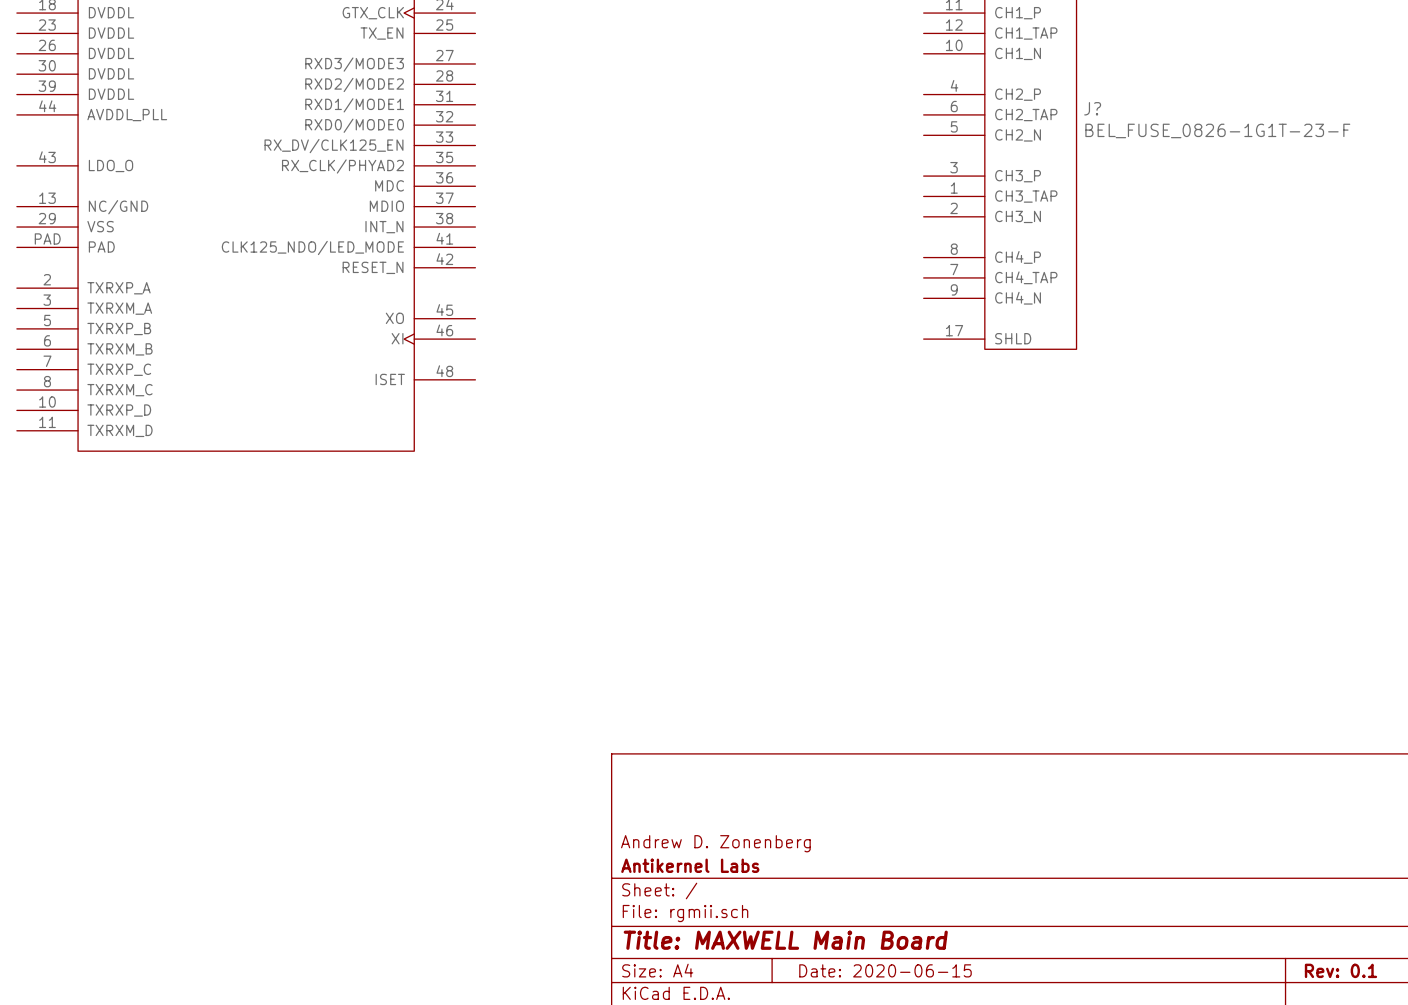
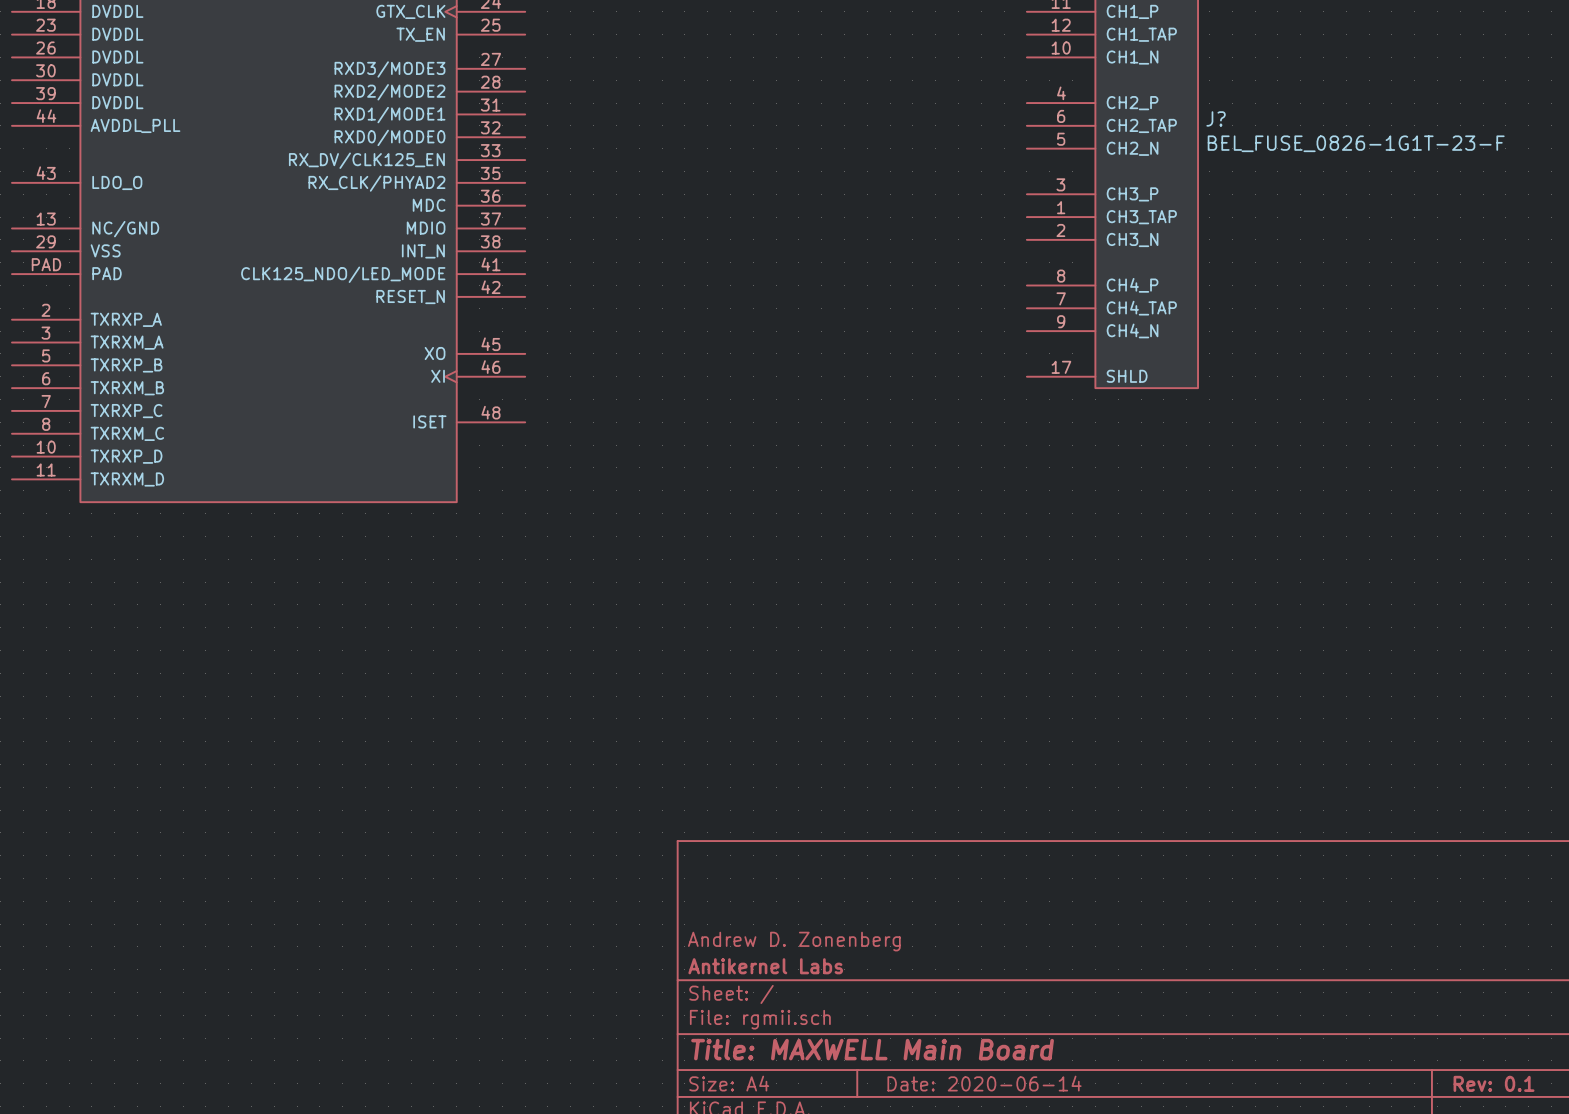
title block: Date: 2020-06-15 (885, 970) -> Date: 2020-06-14 (984, 1083)

